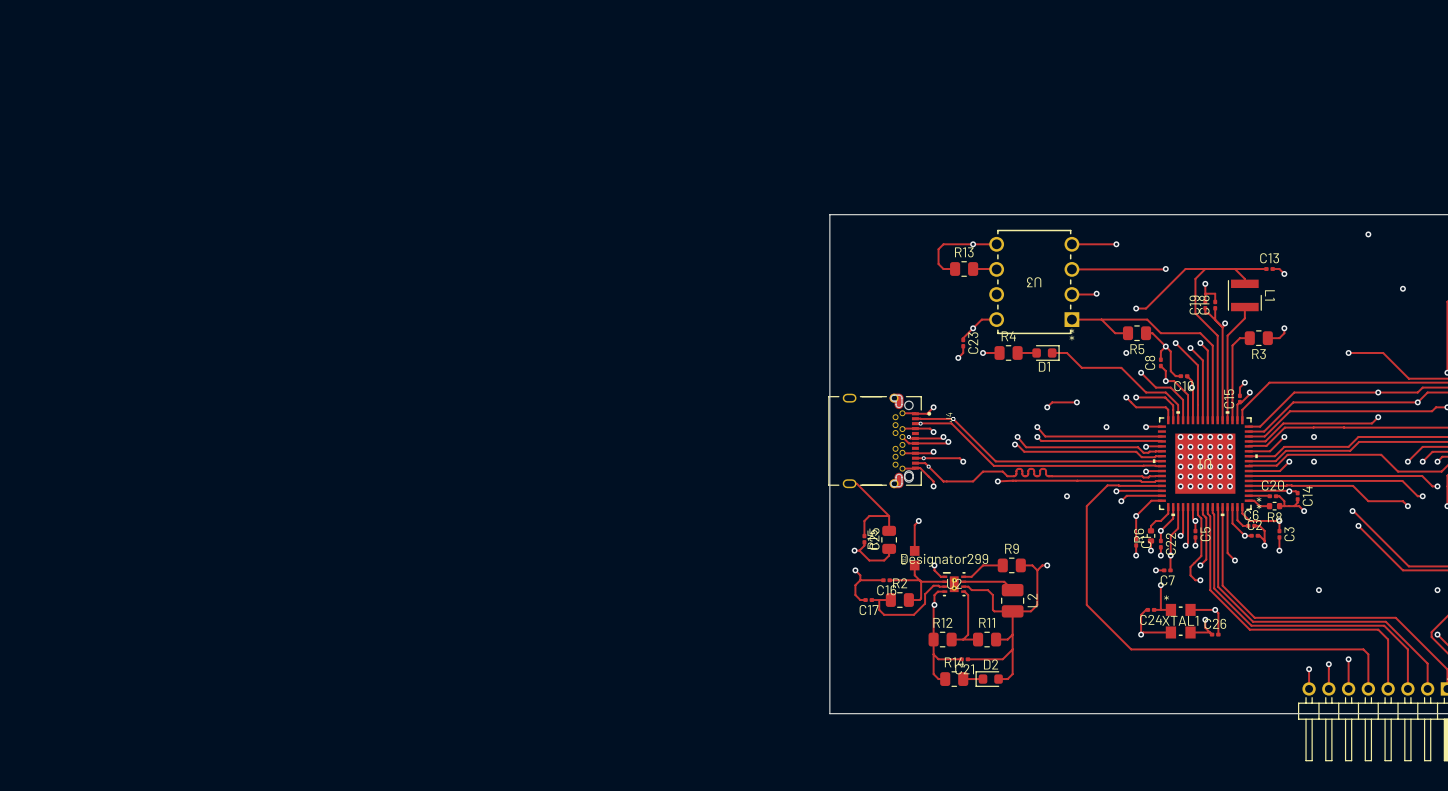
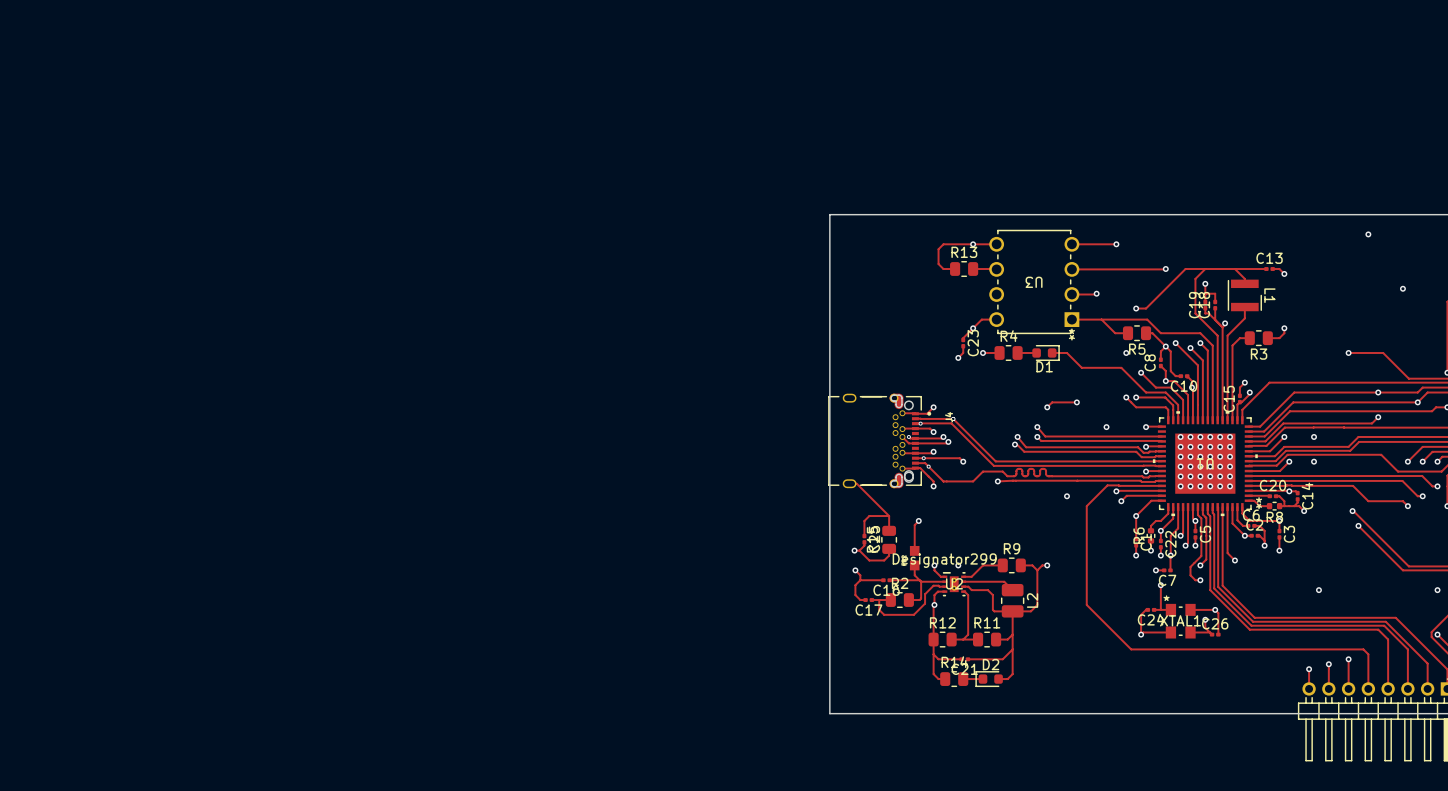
via: none -> (958, 565)

